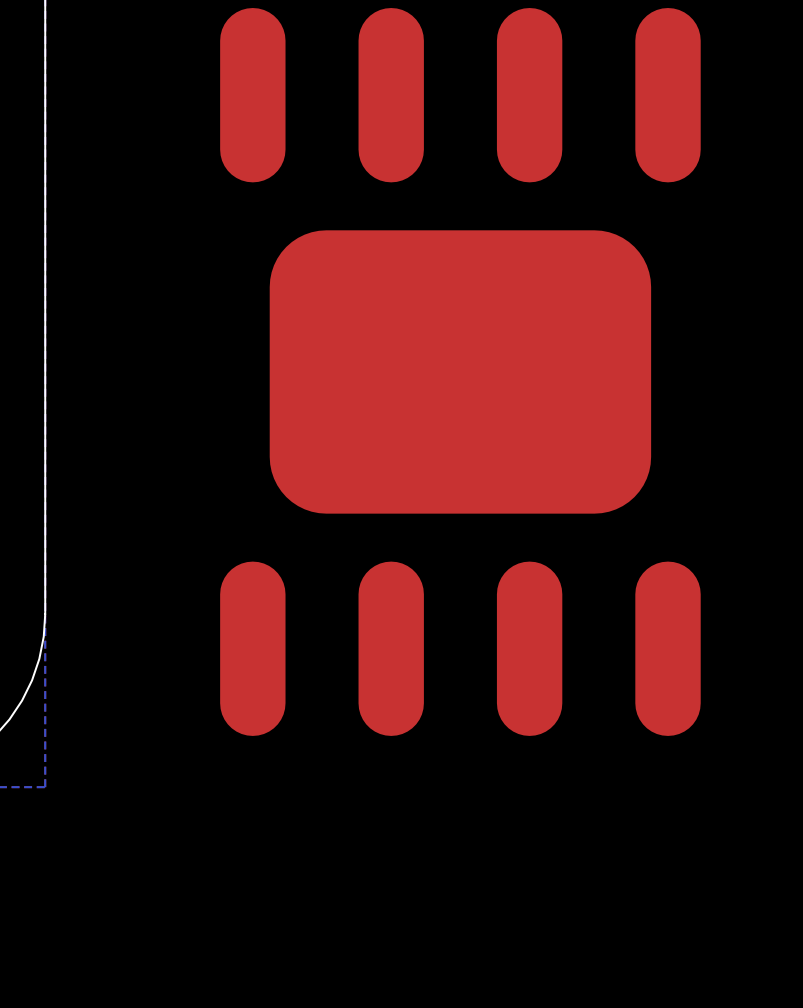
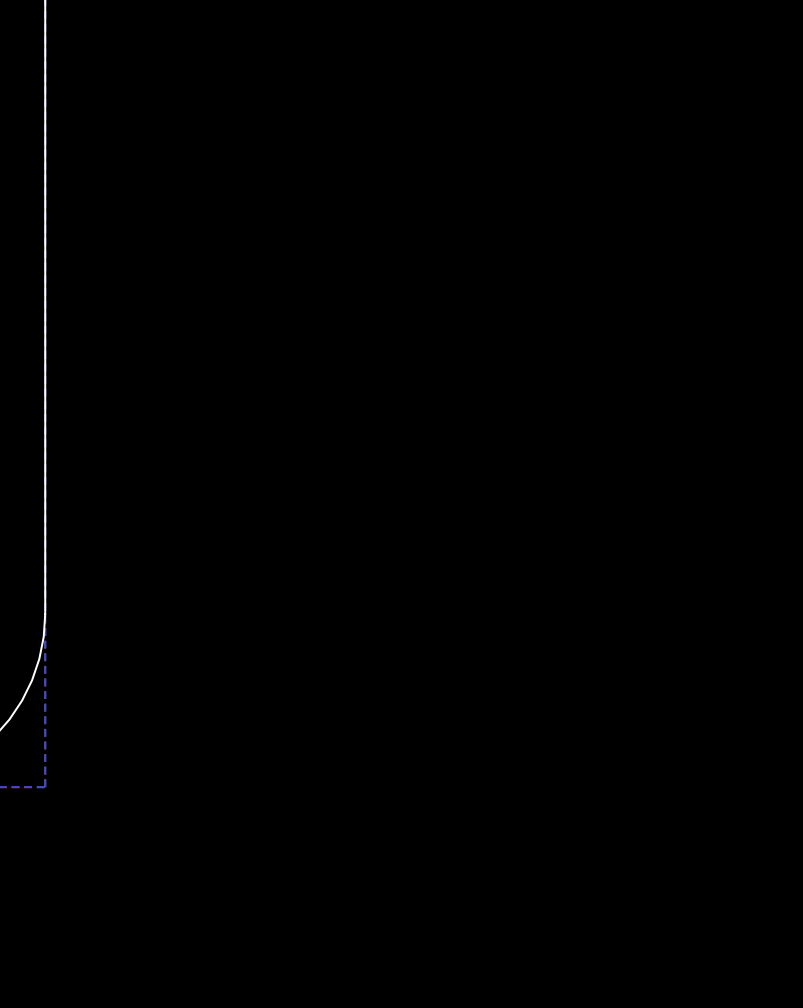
part: (460, 371) -> none

